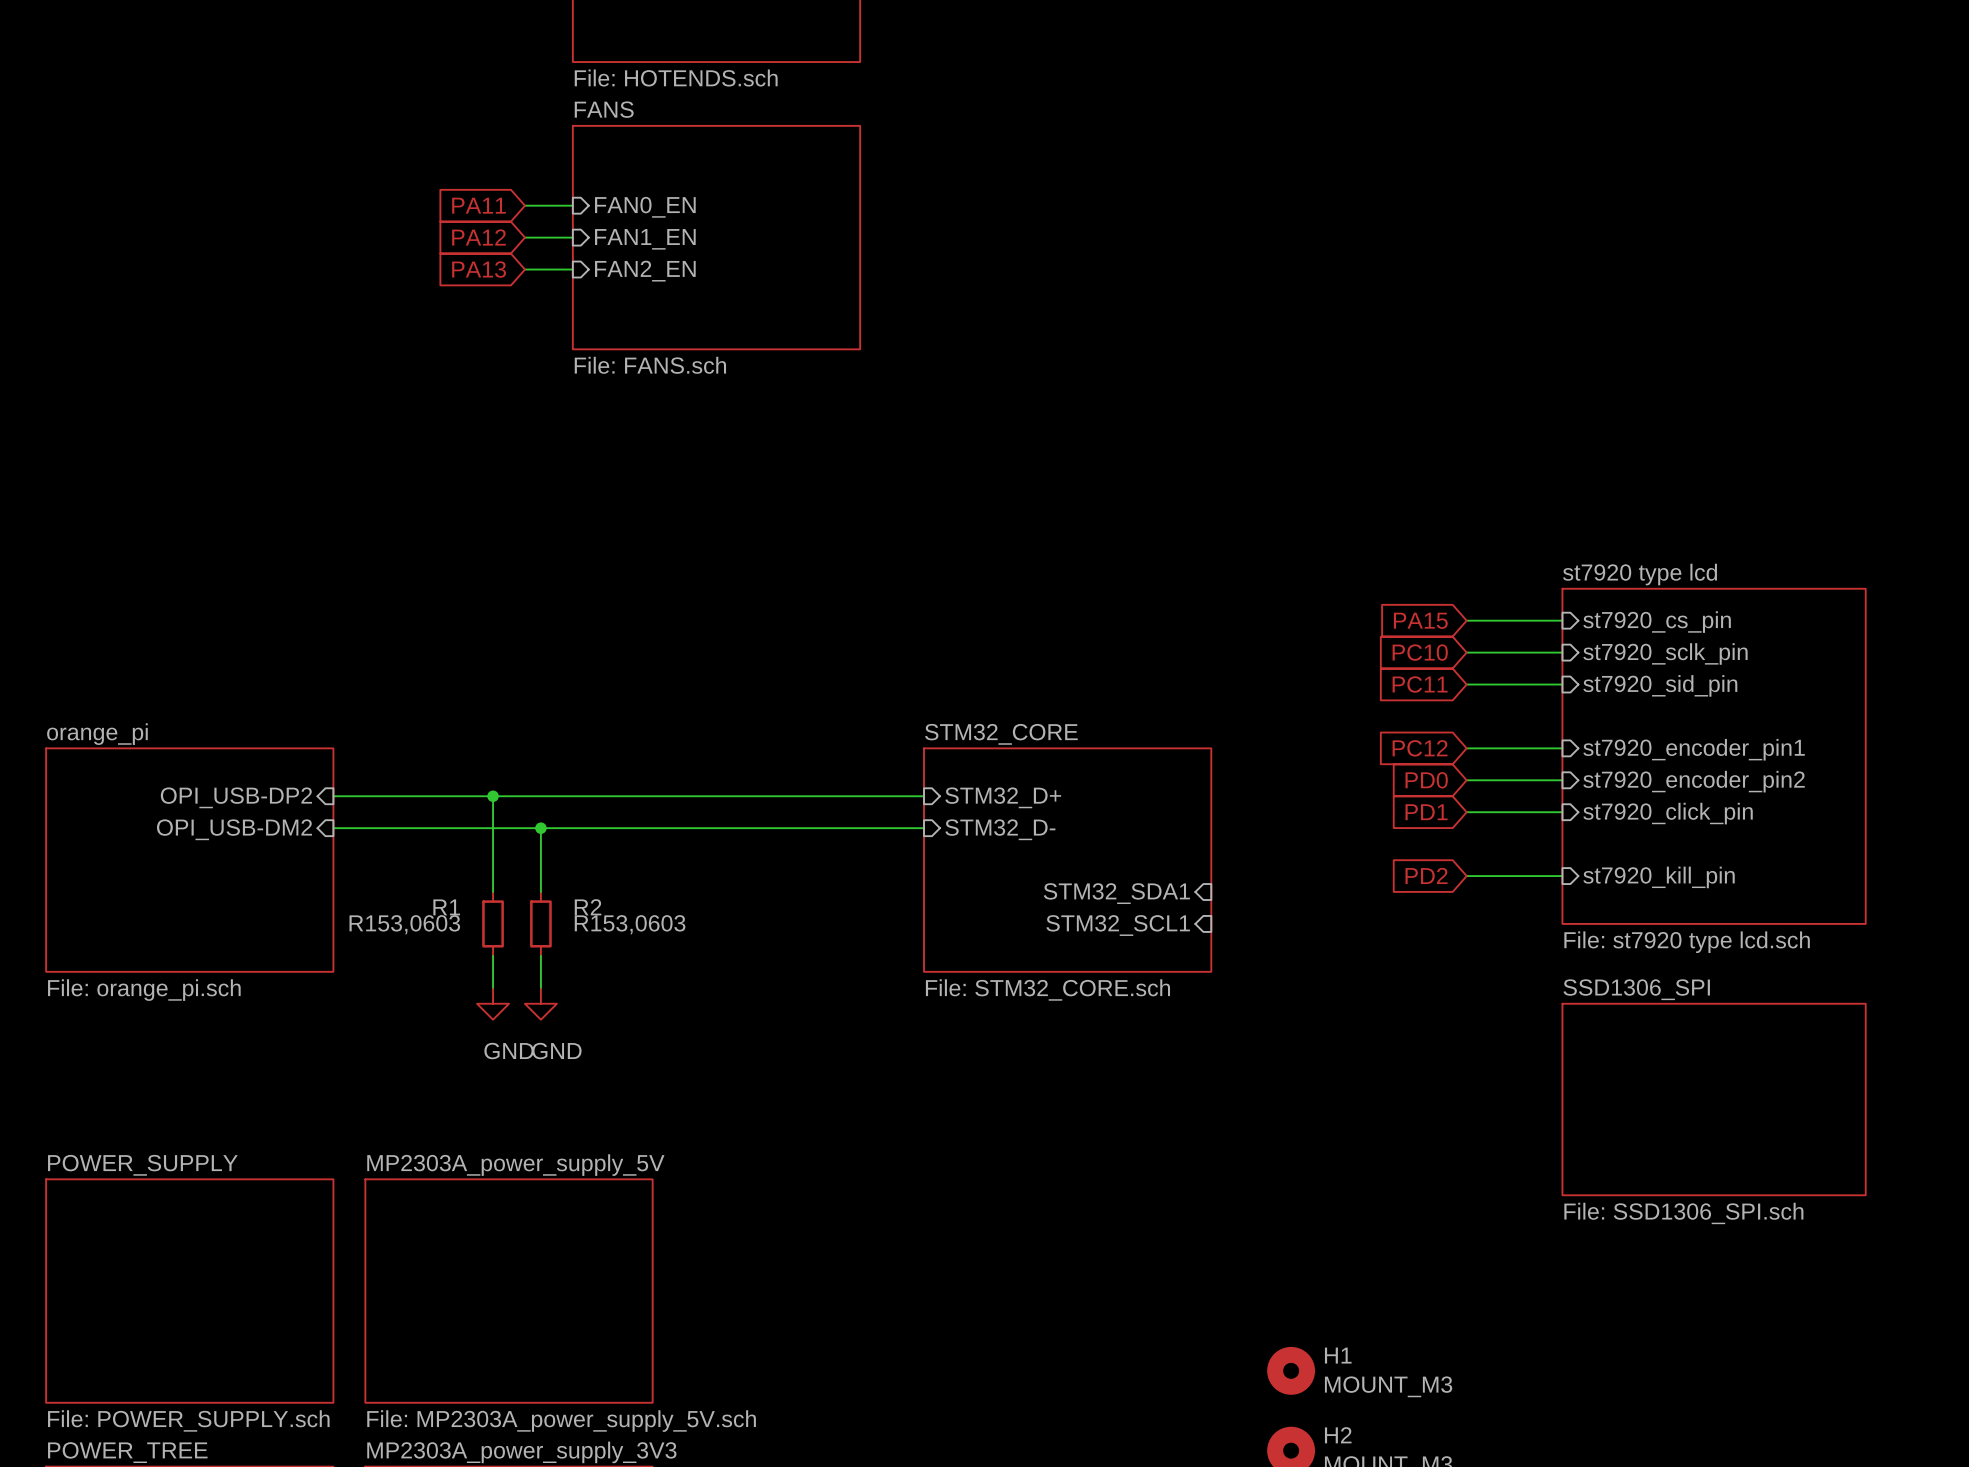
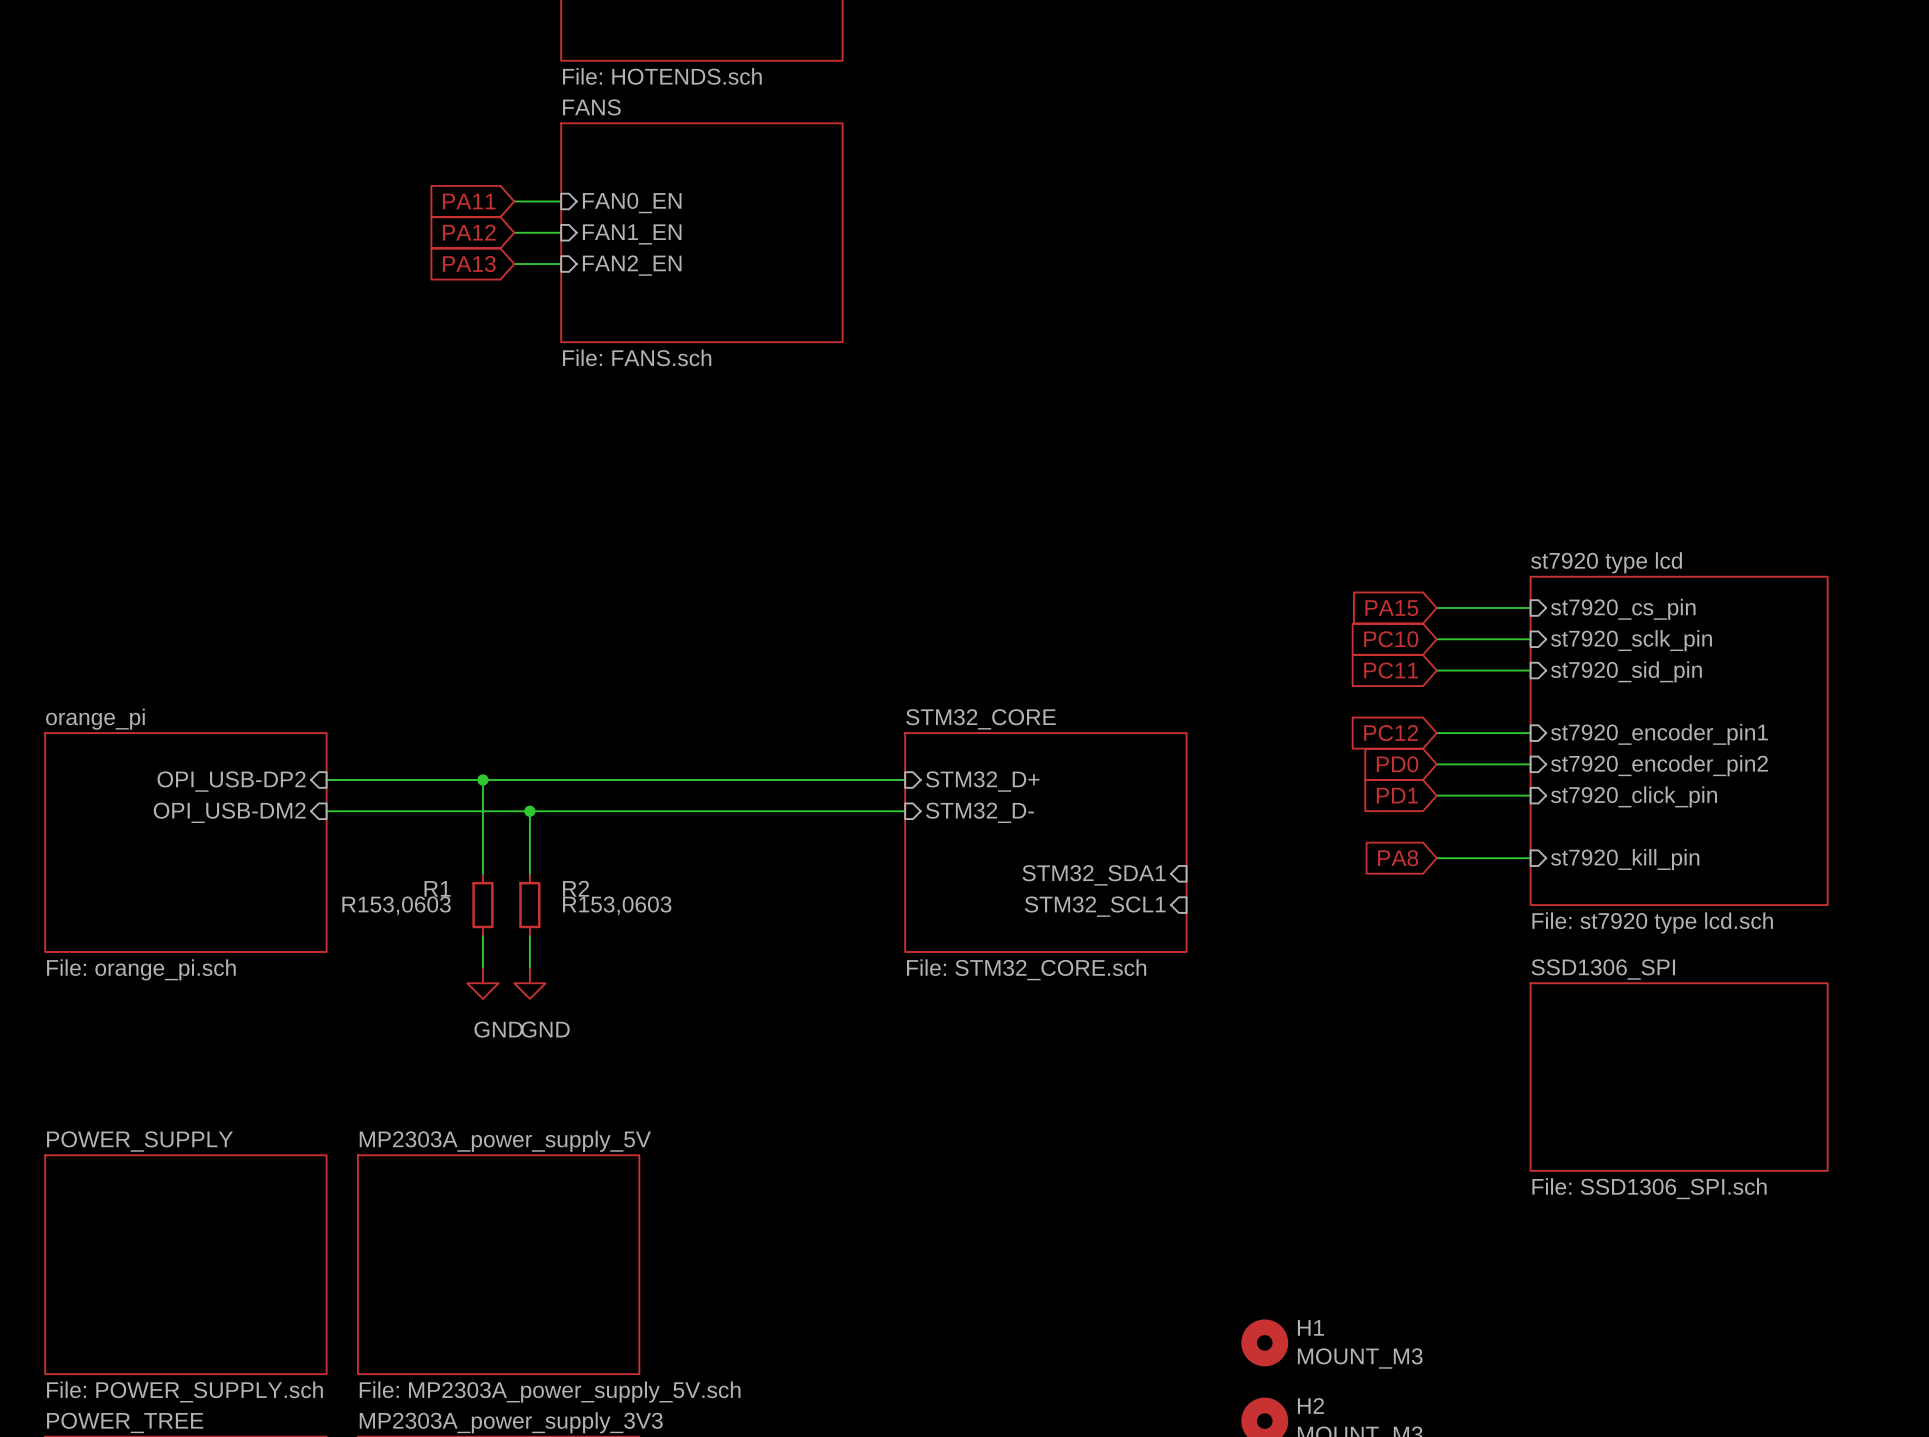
global label: PD2 (1426, 875) -> PA8 (1398, 858)

